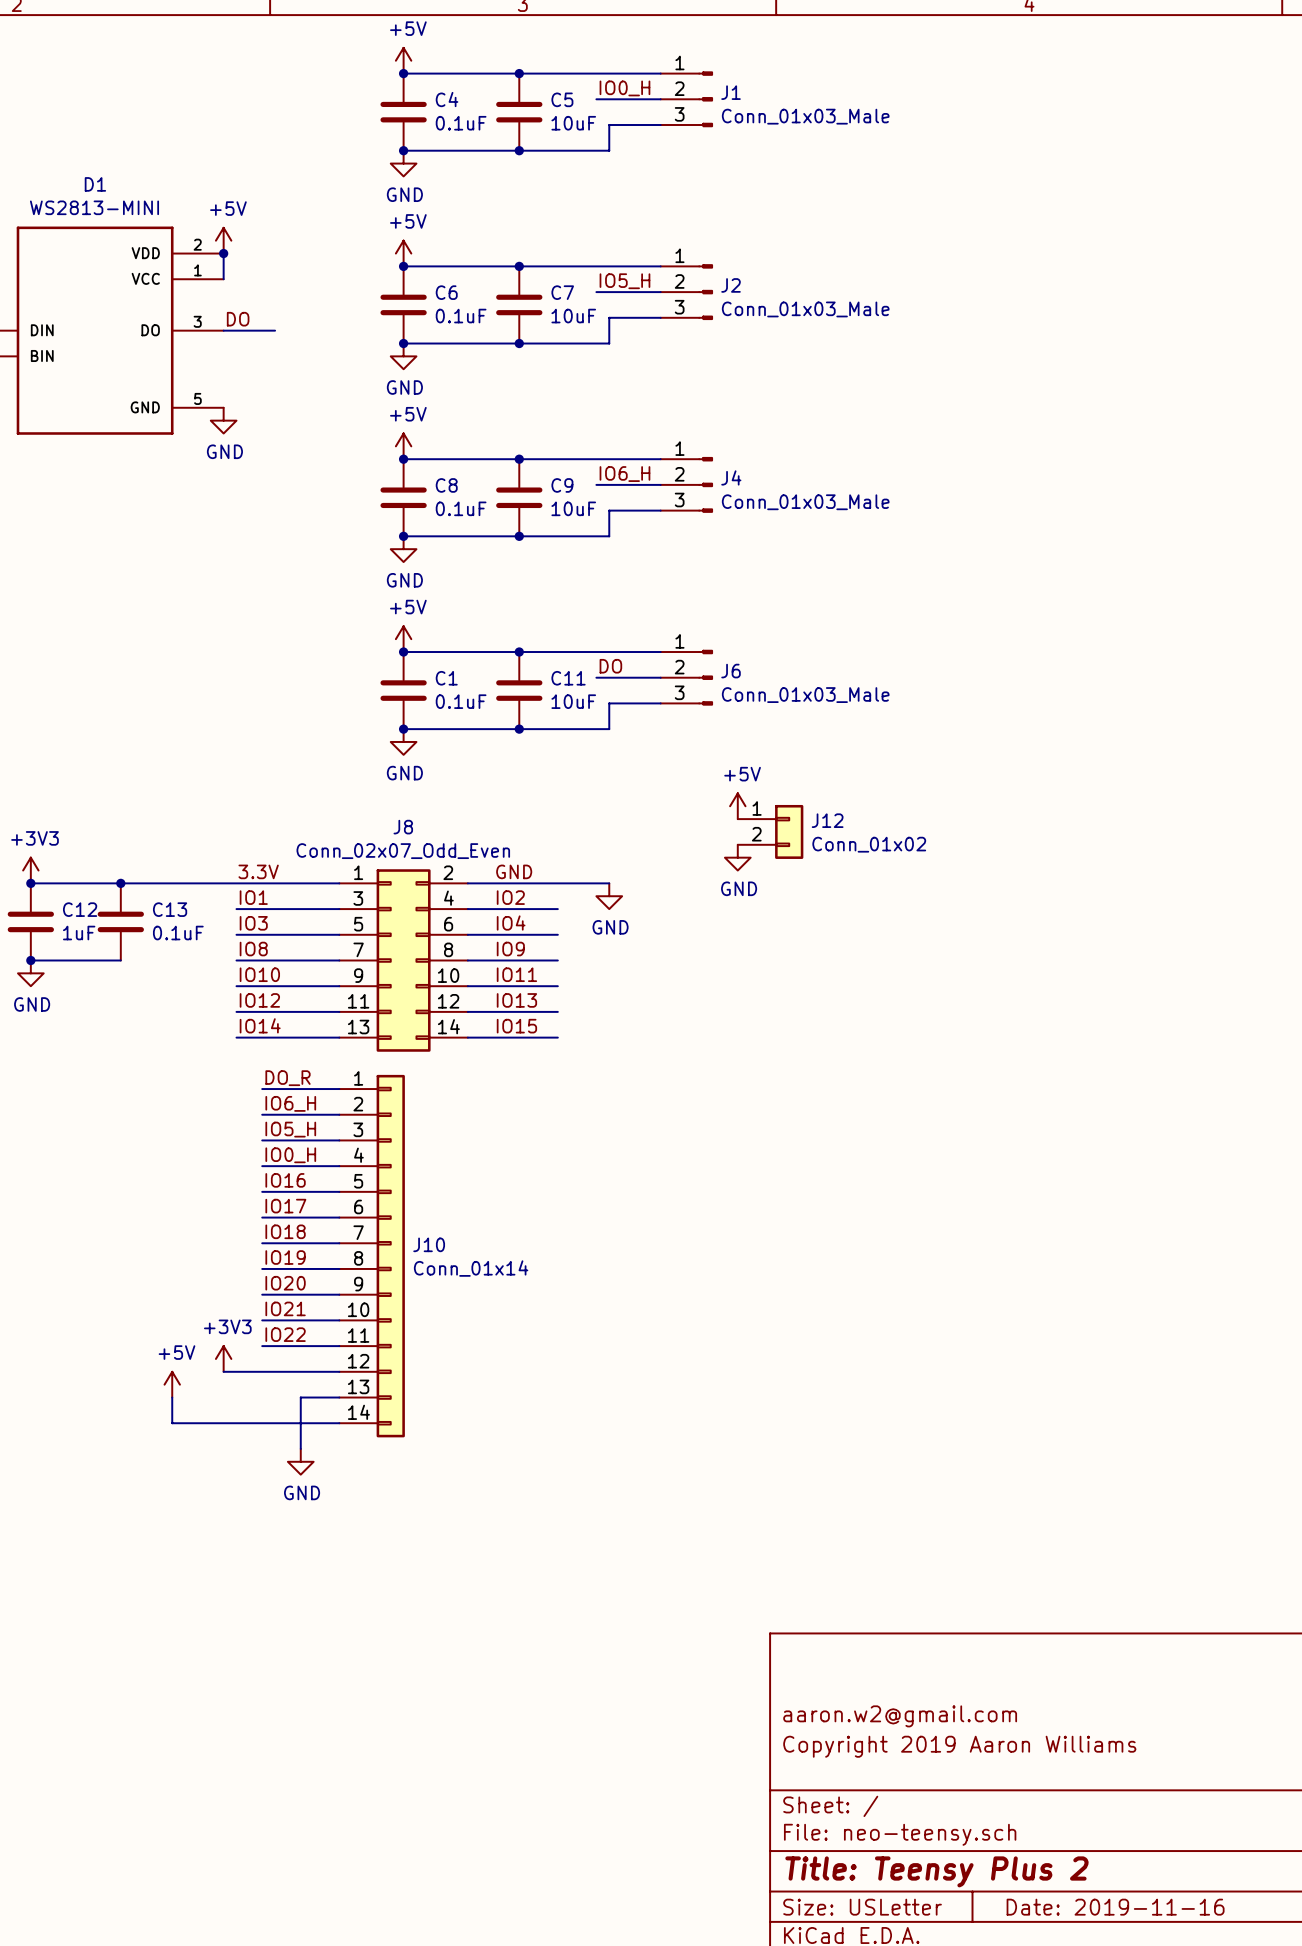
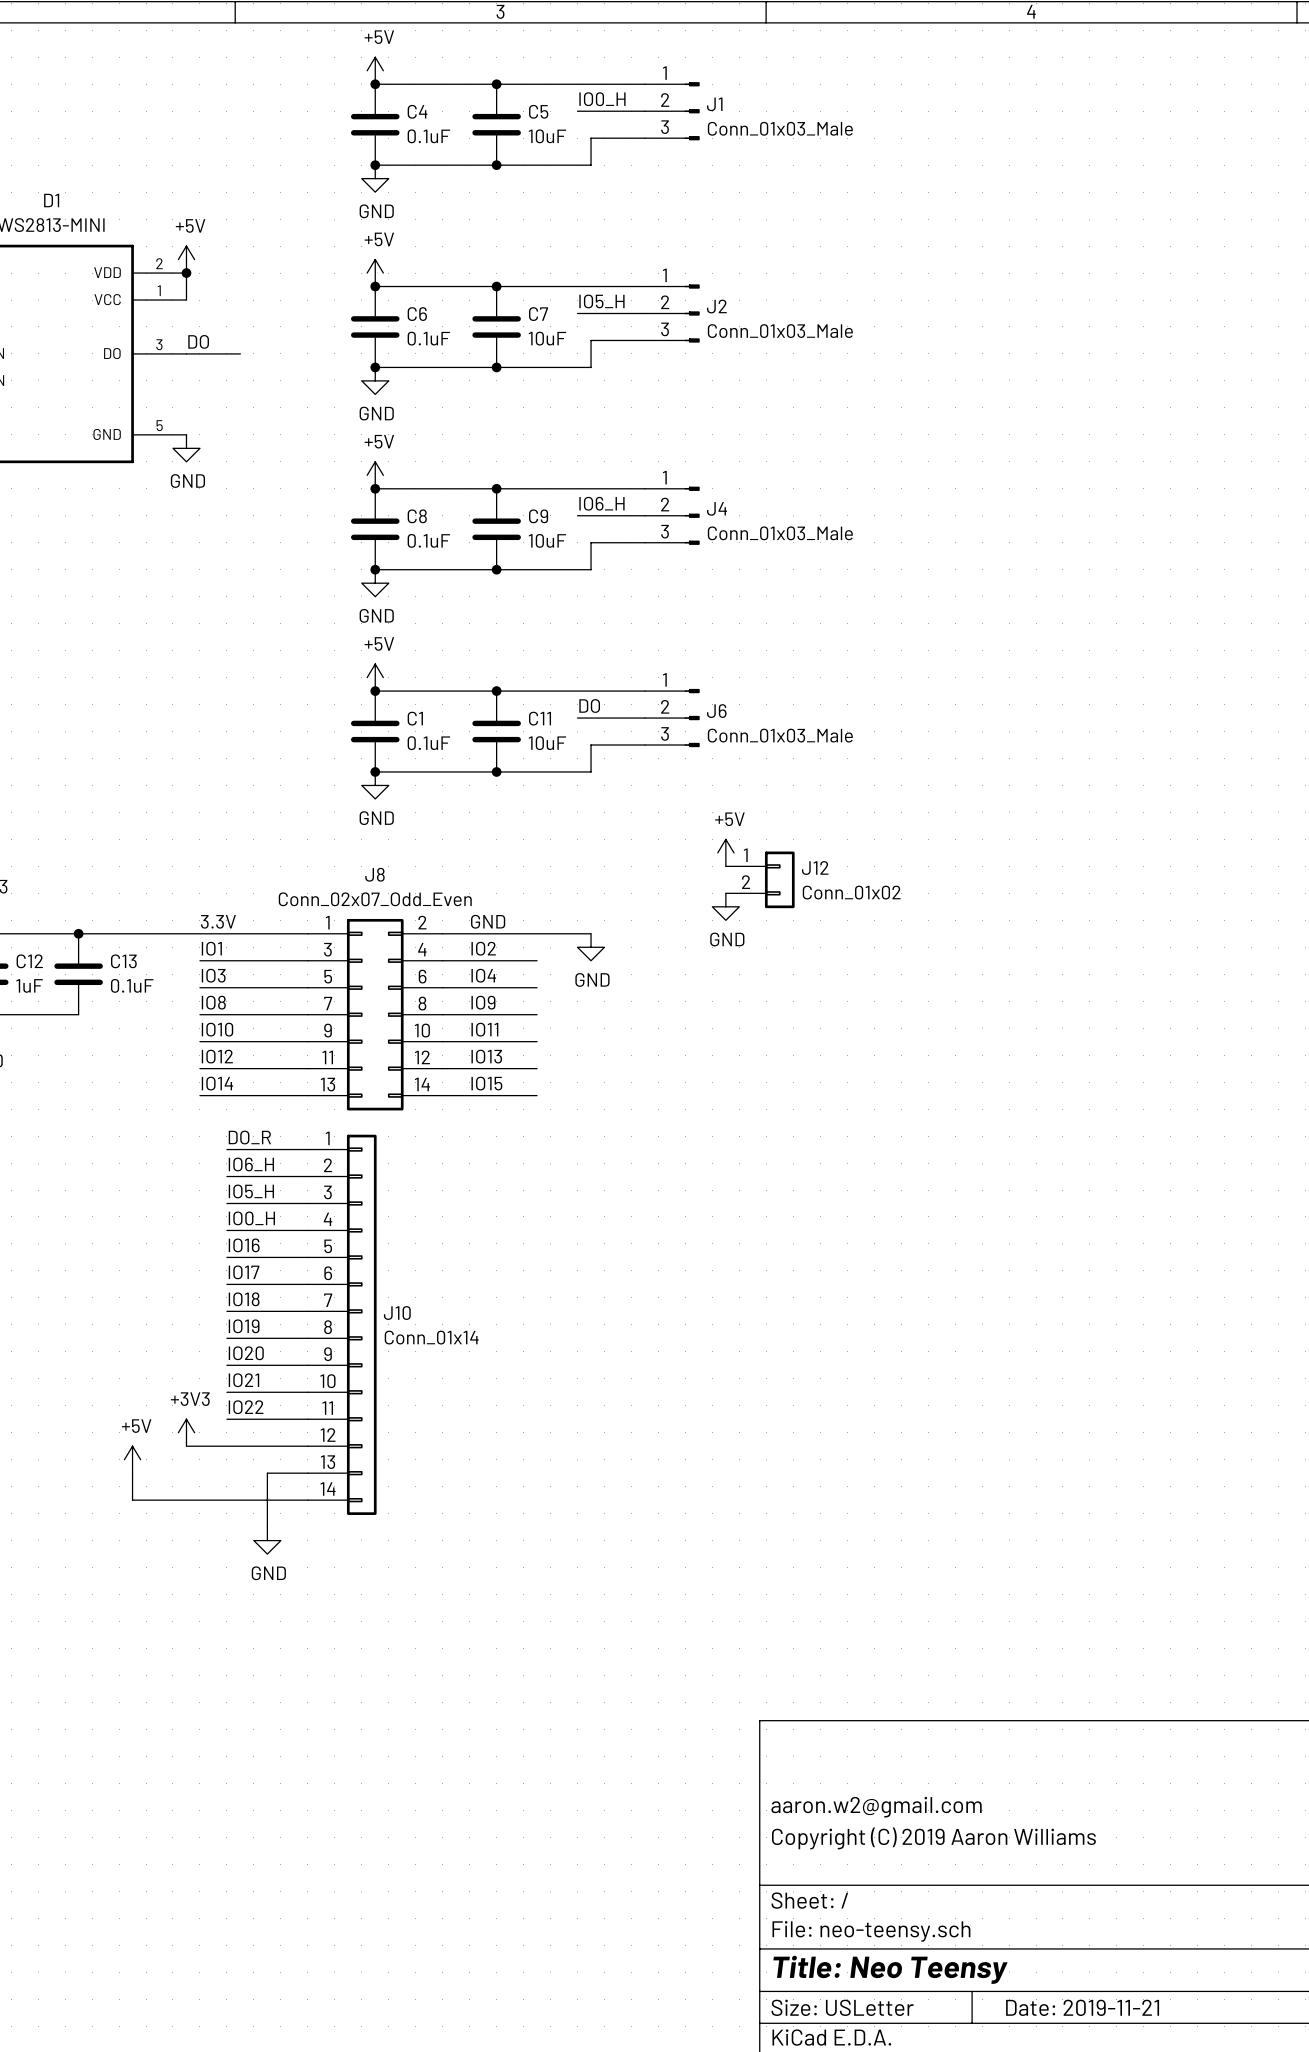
title block: Copyright 2019 Aaron Williams (959, 1746) -> Copyright (C) 2019 Aaron Williams (933, 1838)
title block: Title: Teensy Plus 2 (936, 1871) -> Title: Neo Teensy (890, 1969)
title block: Date: 2019-11-16 (1115, 1907) -> Date: 2019-11-21 (1082, 2007)

